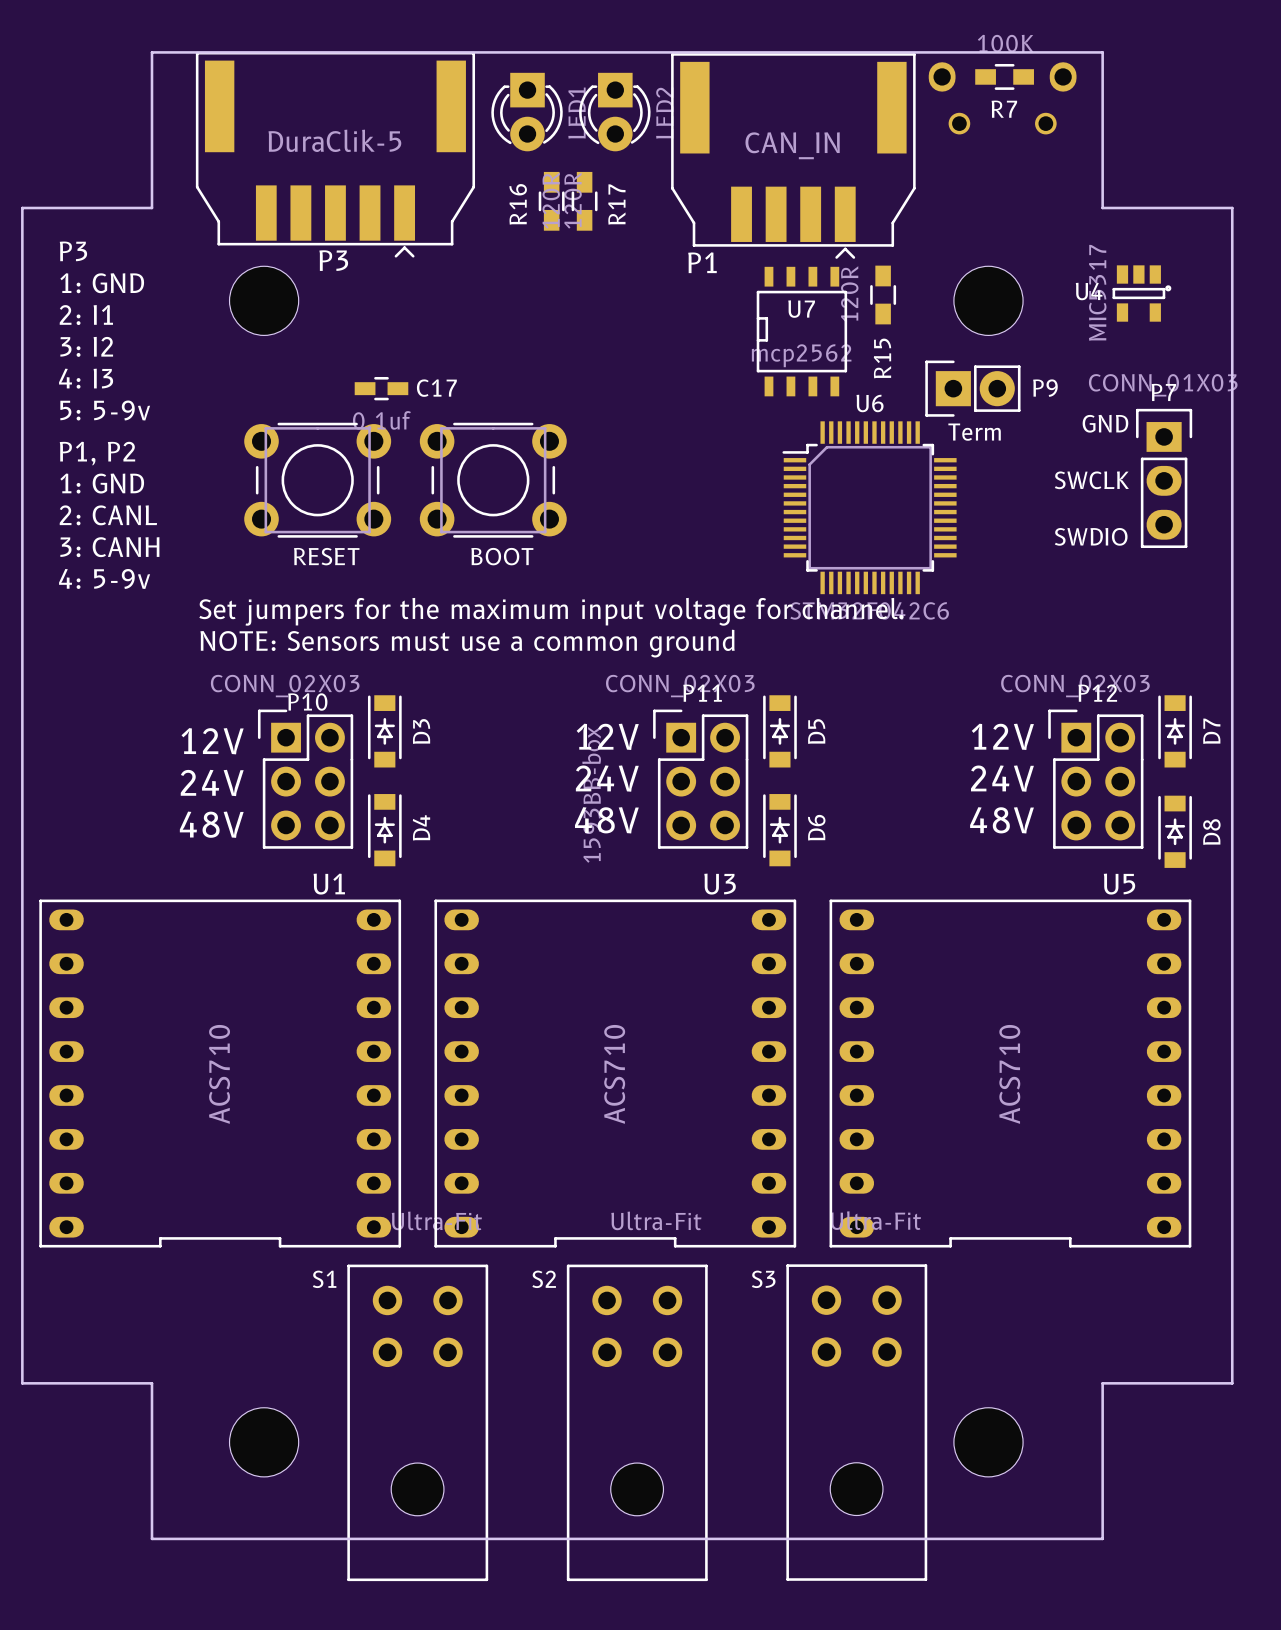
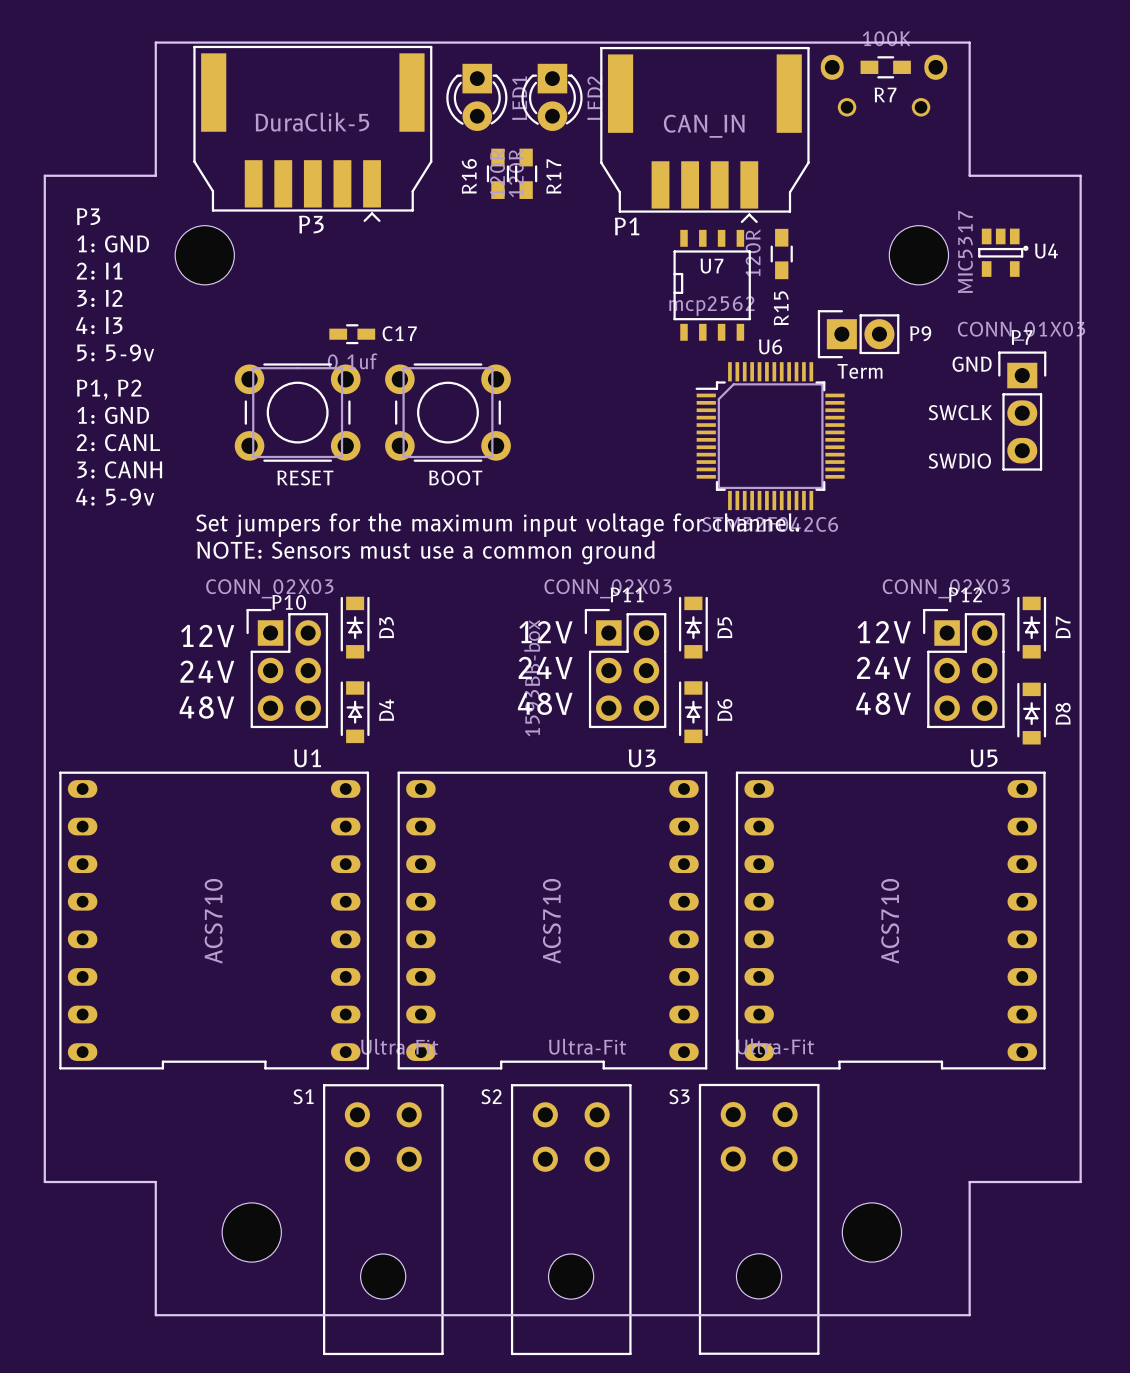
part footprint: [21, 51, 1234, 1541] -> [43, 41, 1082, 1317]
U4 name position: U4 (1089, 291) -> U4 (1046, 251)

